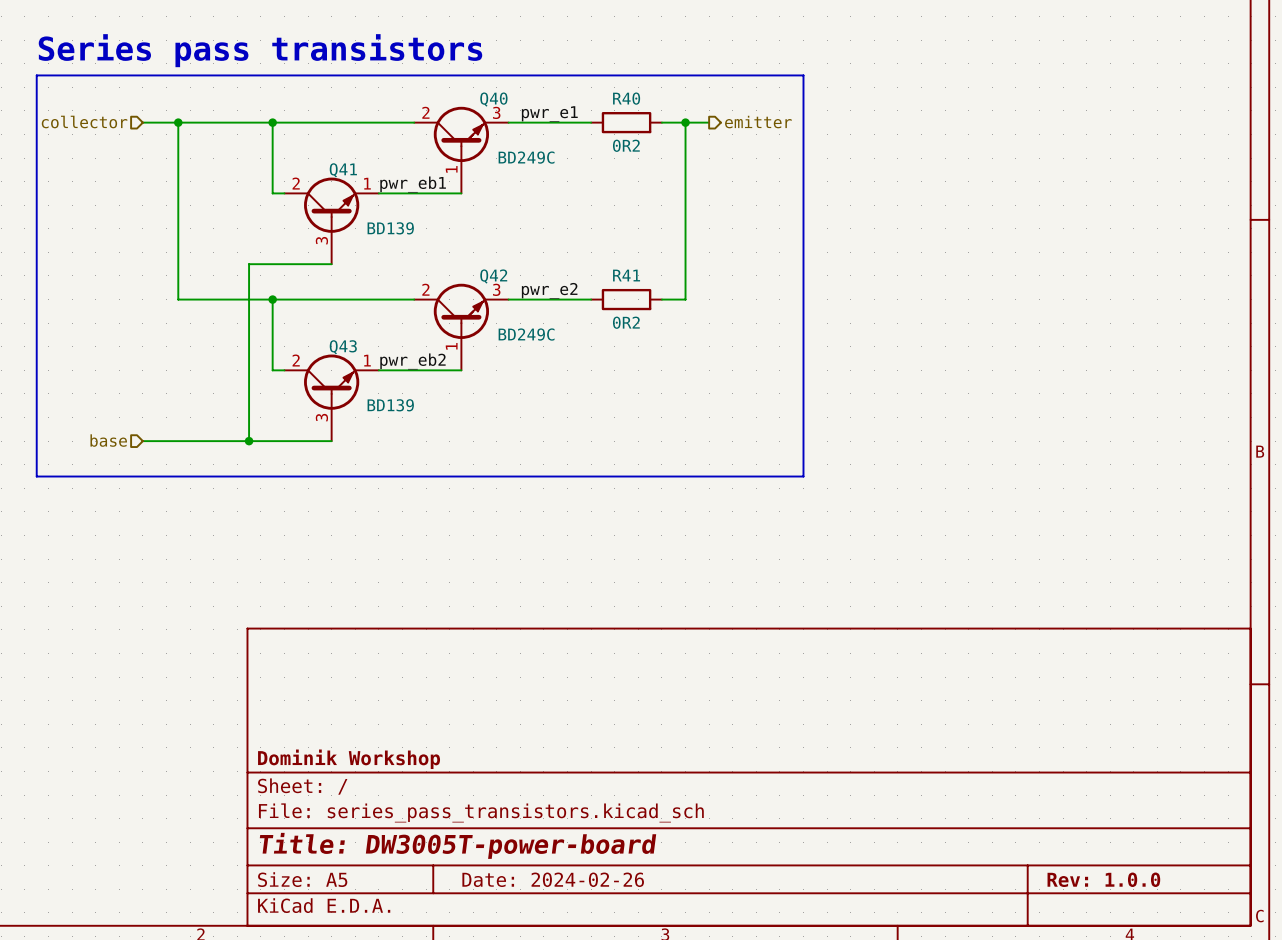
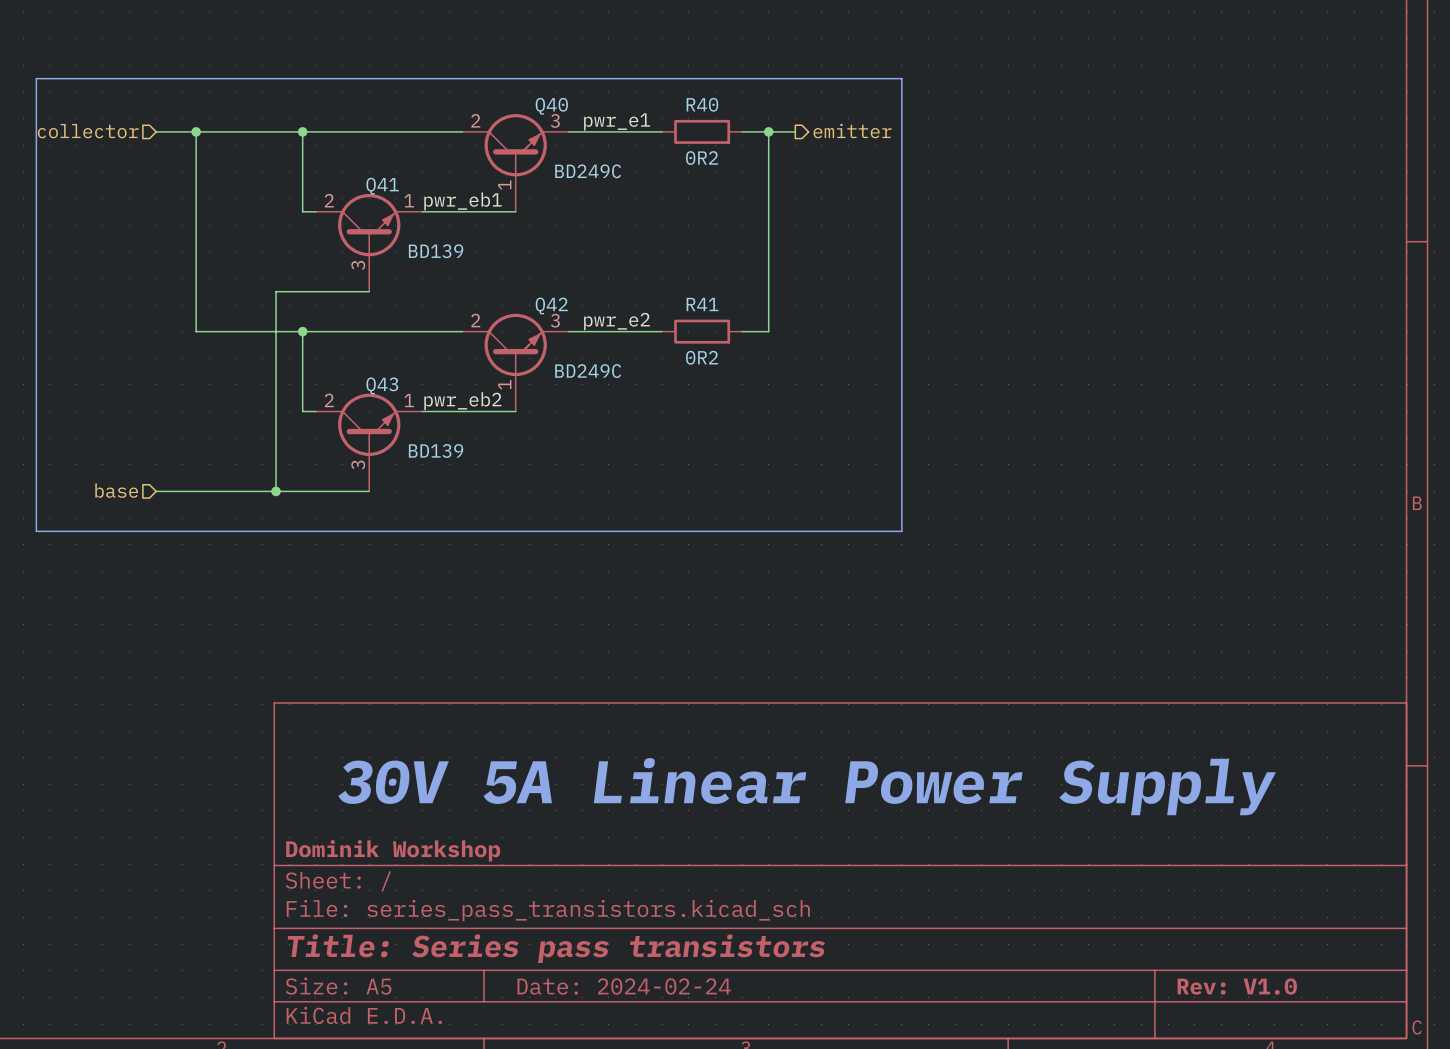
text: Series pass transistors (260, 50) -> none
text: none -> 30V 5A Linear Power Supply (807, 786)
title block: Title: DW3005T-power-board (457, 845) -> Title: Series pass transistors (556, 948)
title block: Date: 2024-02-26 (553, 879) -> Date: 2024-02-24 (624, 986)
title block: Rev: 1.0.0 (1103, 879) -> Rev: V1.0 (1237, 986)

